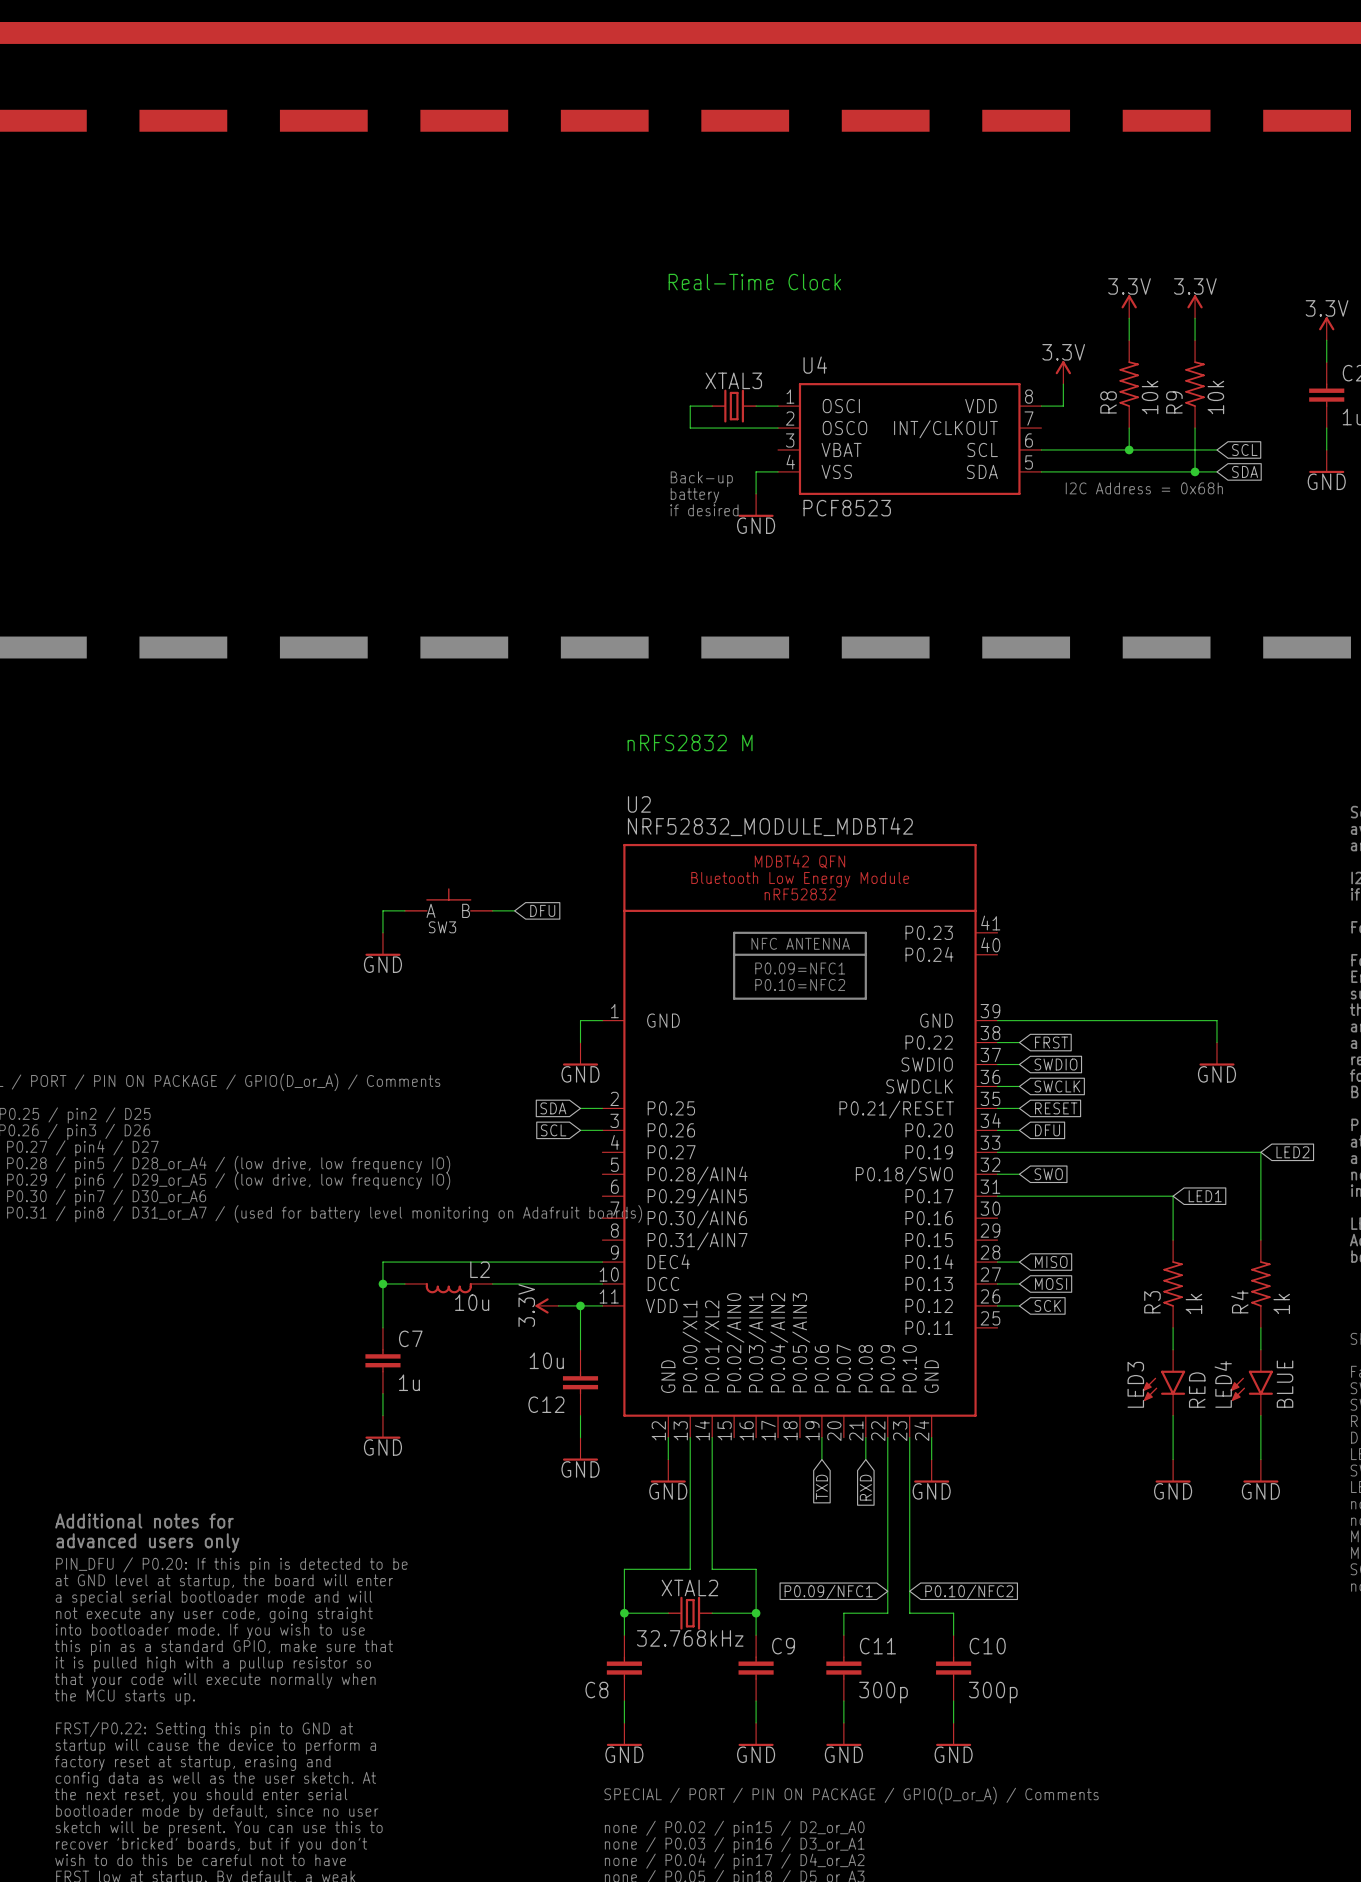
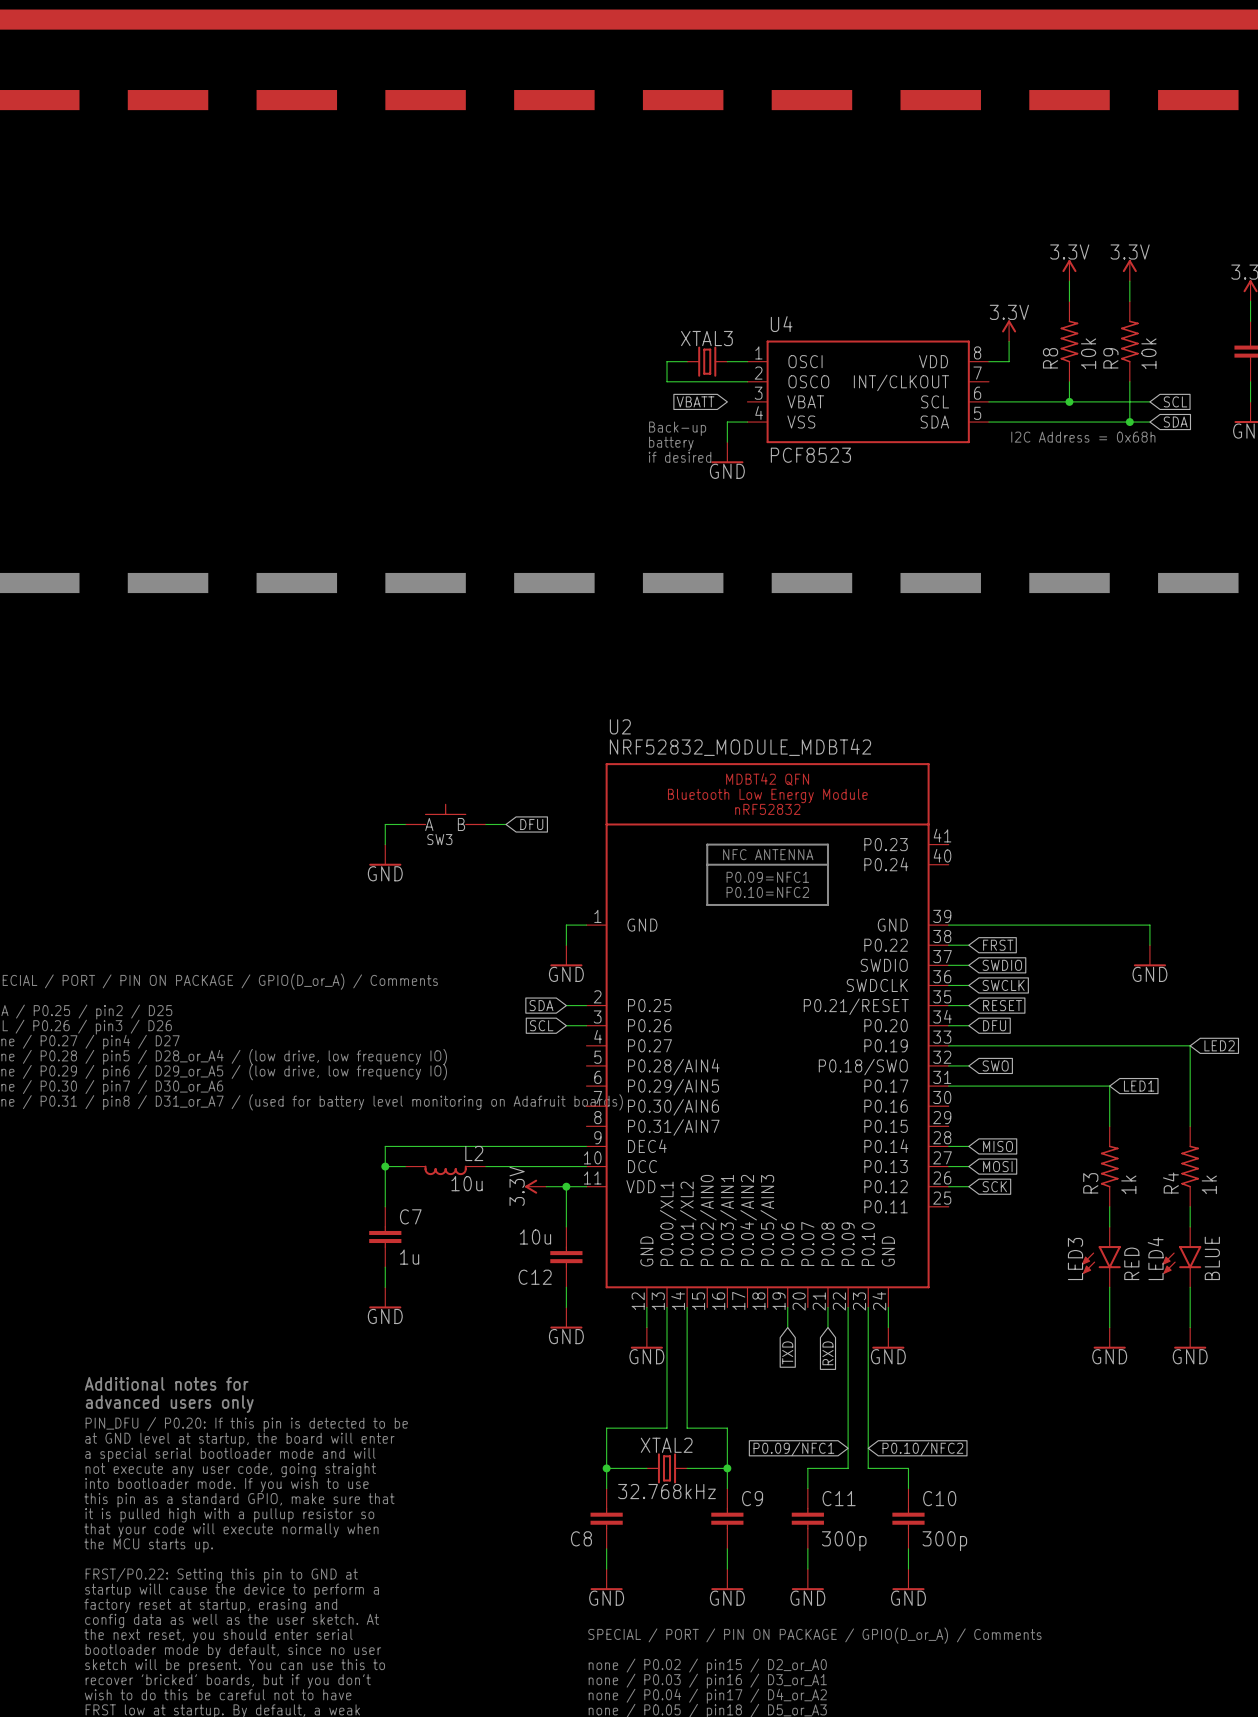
text: Real-Time Clock (754, 282) -> none
global label: none -> VBATT (695, 401)
text: nRFS2832 M (690, 742) -> none

